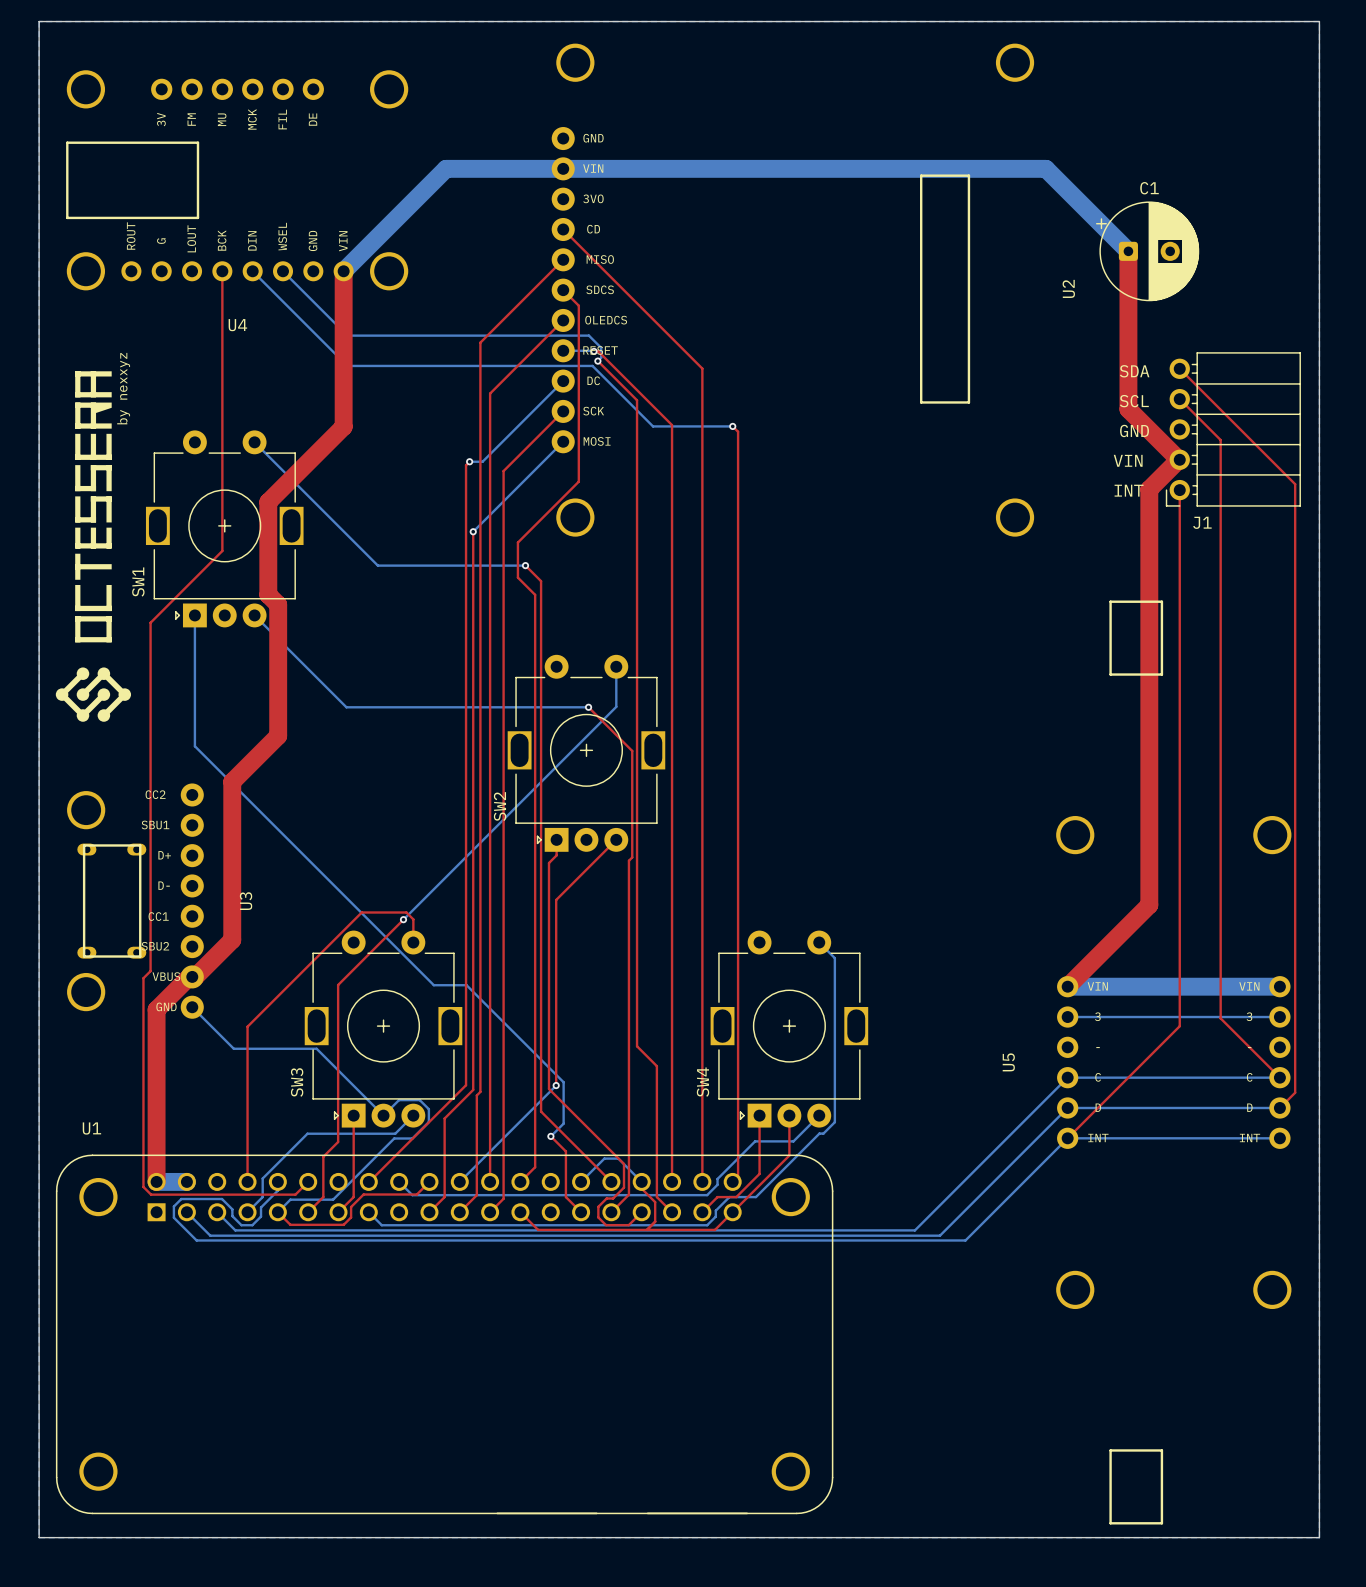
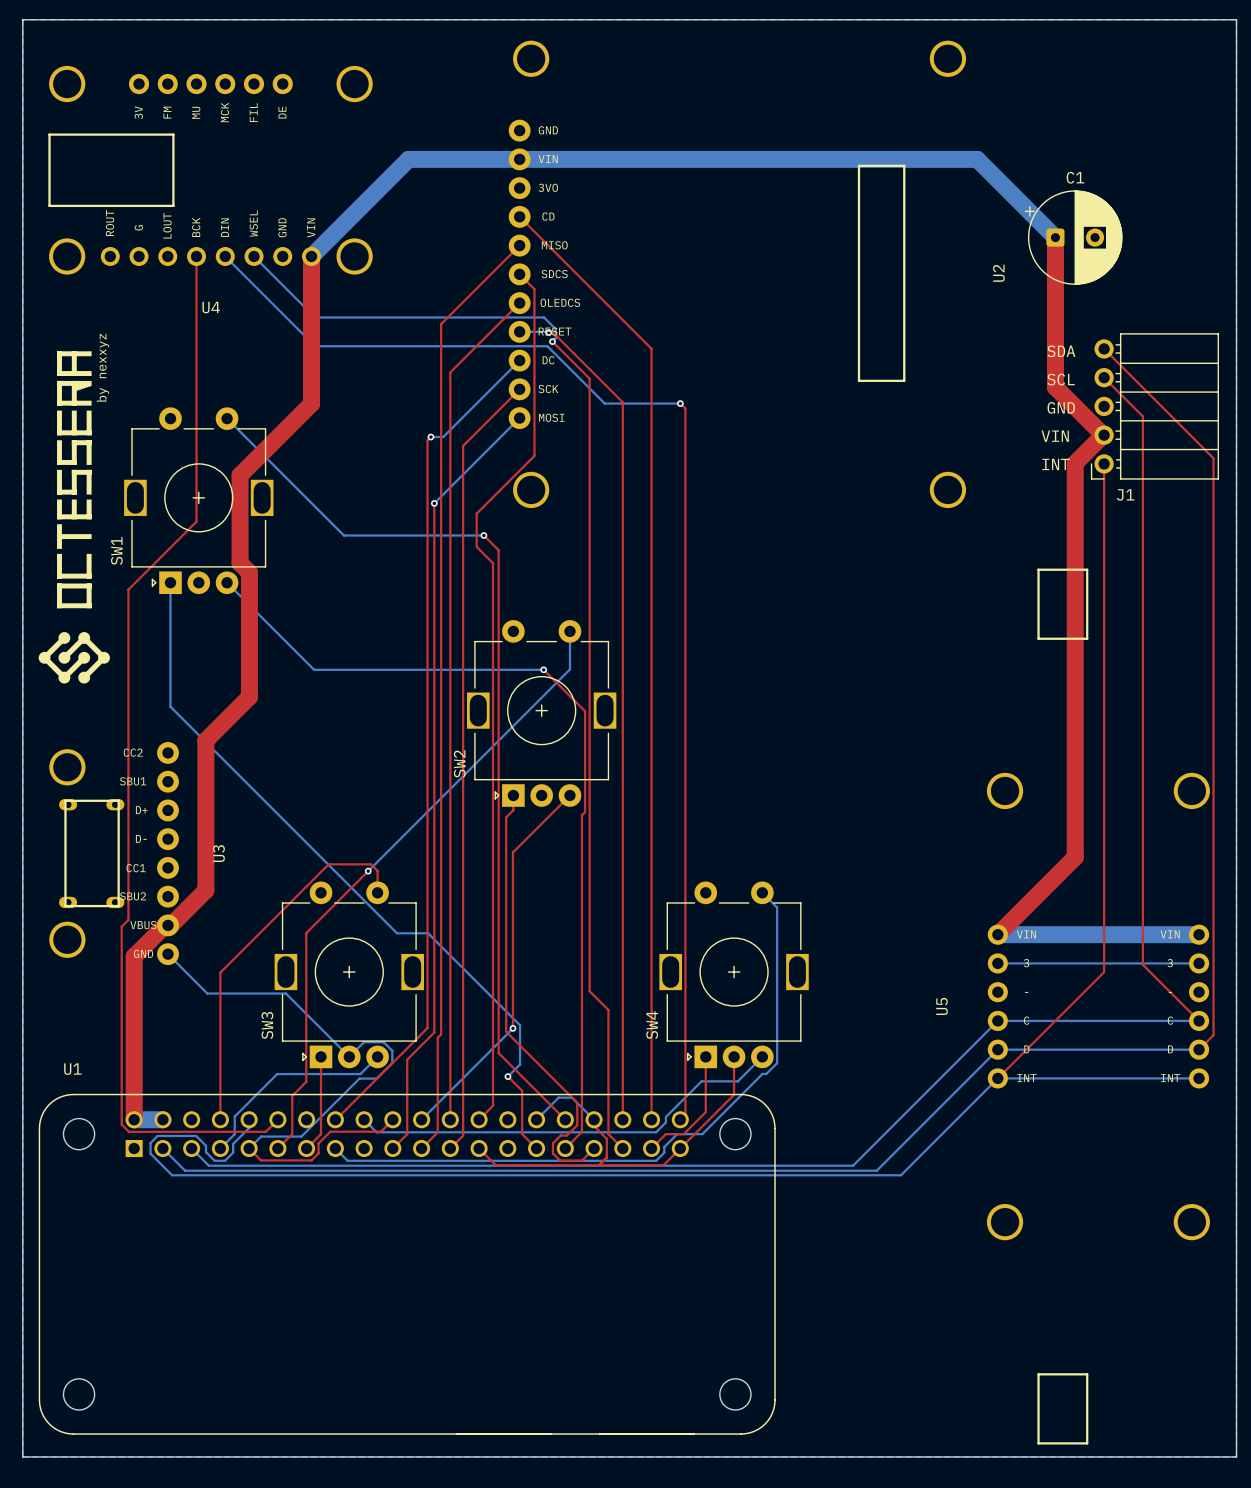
U1 footprint: [55, 1154, 834, 1515] -> [38, 1093, 776, 1435]

